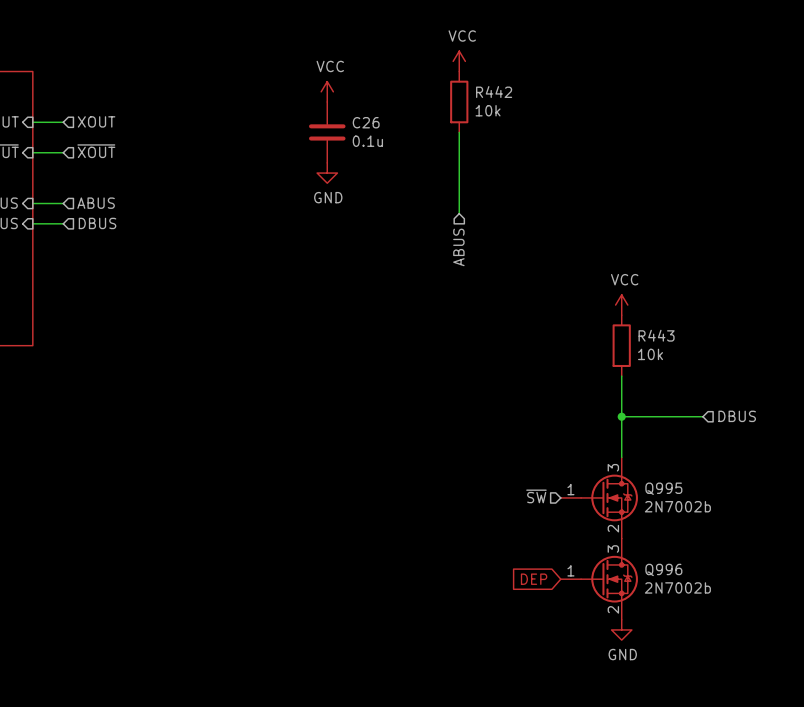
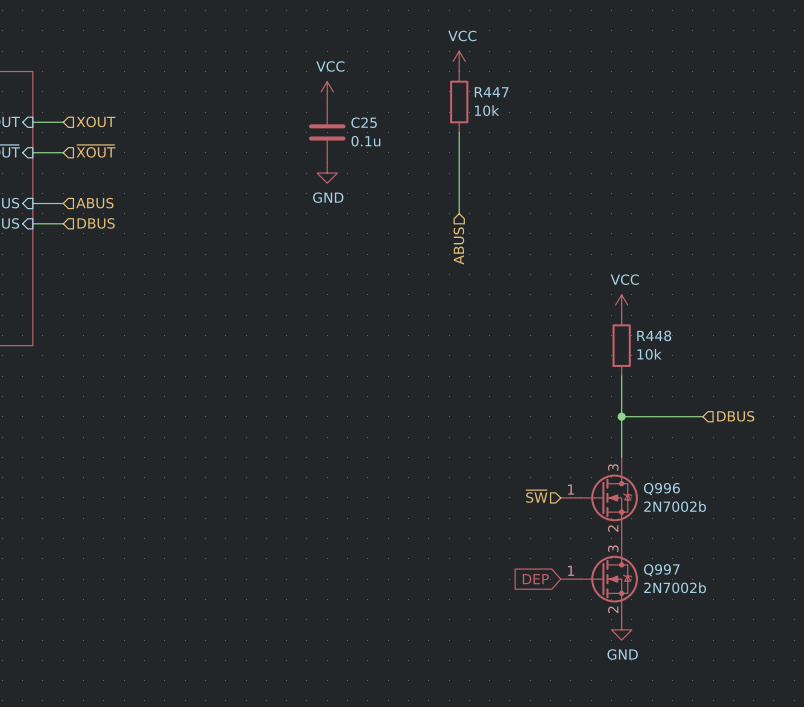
R442 name: R442 (494, 92) -> R447 (491, 92)
C26 name: C26 (366, 122) -> C25 (364, 122)
R443 name: R443 (656, 335) -> R448 (654, 335)
Q995 name: Q995 (663, 488) -> Q996 (661, 489)
Q996 name: Q996 (663, 569) -> Q997 (661, 570)

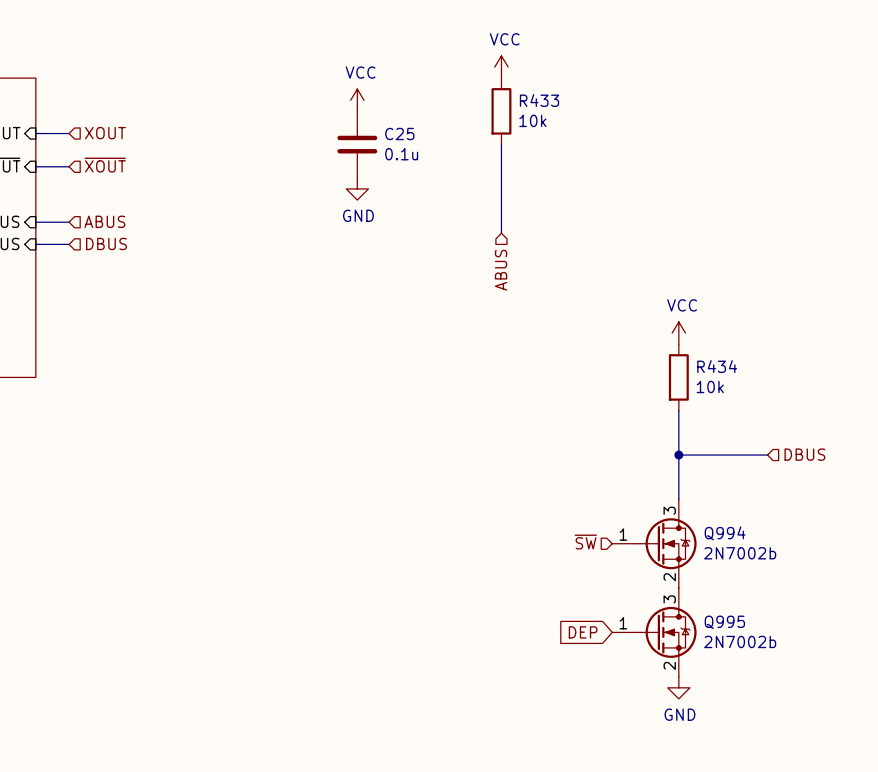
R447 name: R447 (491, 92) -> R433 (539, 100)
R448 name: R448 (654, 335) -> R434 (717, 366)
Q996 name: Q996 (661, 489) -> Q994 (725, 533)
Q997 name: Q997 (661, 570) -> Q995 (724, 622)

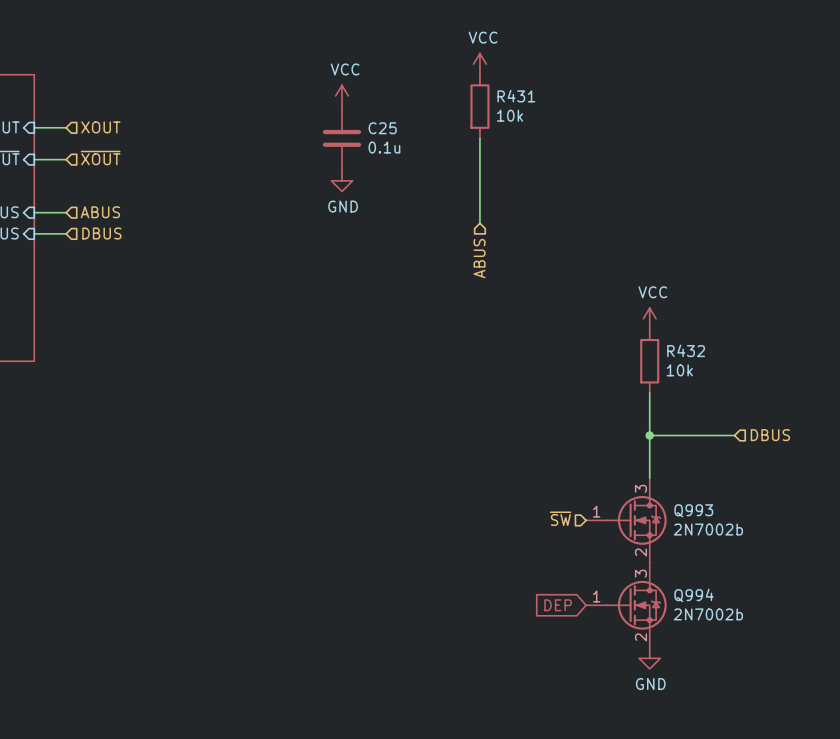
R433 name: R433 (539, 100) -> R431 (516, 96)
R434 name: R434 (717, 366) -> R432 (686, 350)
Q994 name: Q994 (725, 533) -> Q993 (693, 510)
Q995 name: Q995 (724, 622) -> Q994 (694, 595)

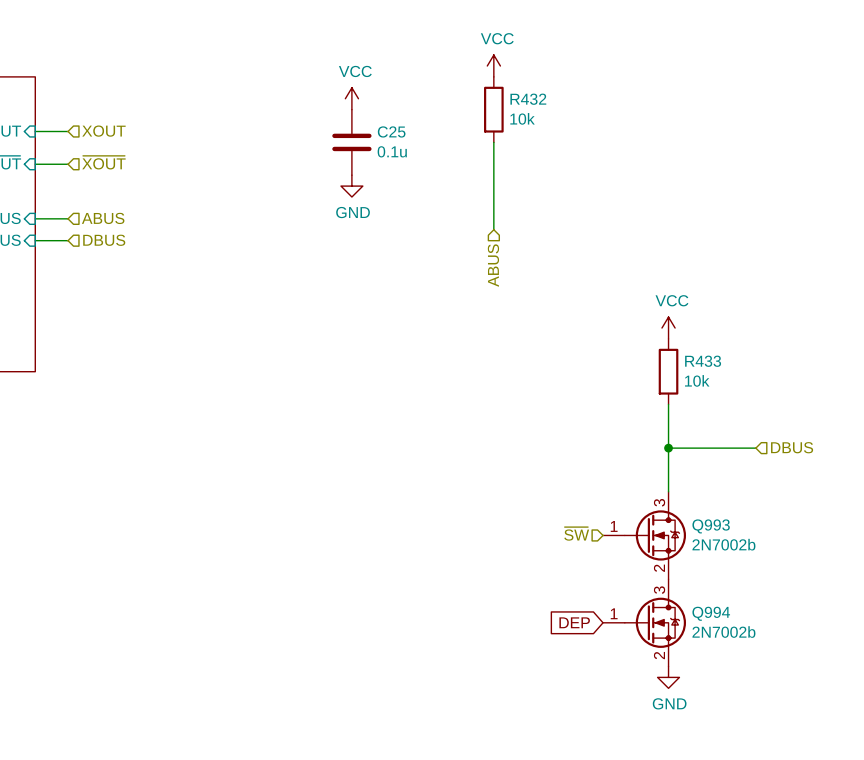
R431 name: R431 (516, 96) -> R432 (528, 99)
R432 name: R432 (686, 350) -> R433 (703, 361)

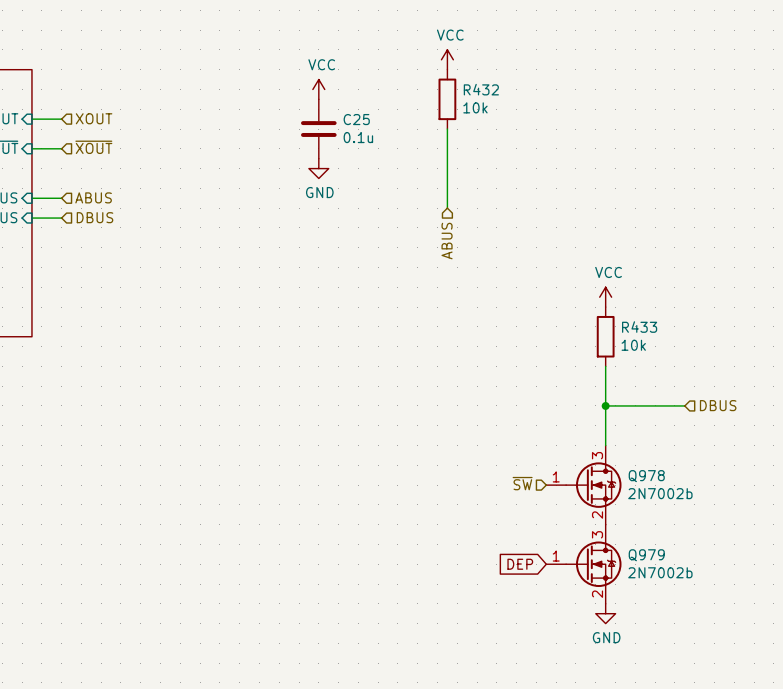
Q993 name: Q993 (711, 526) -> Q978 (646, 476)
Q994 name: Q994 (711, 613) -> Q979 (646, 555)

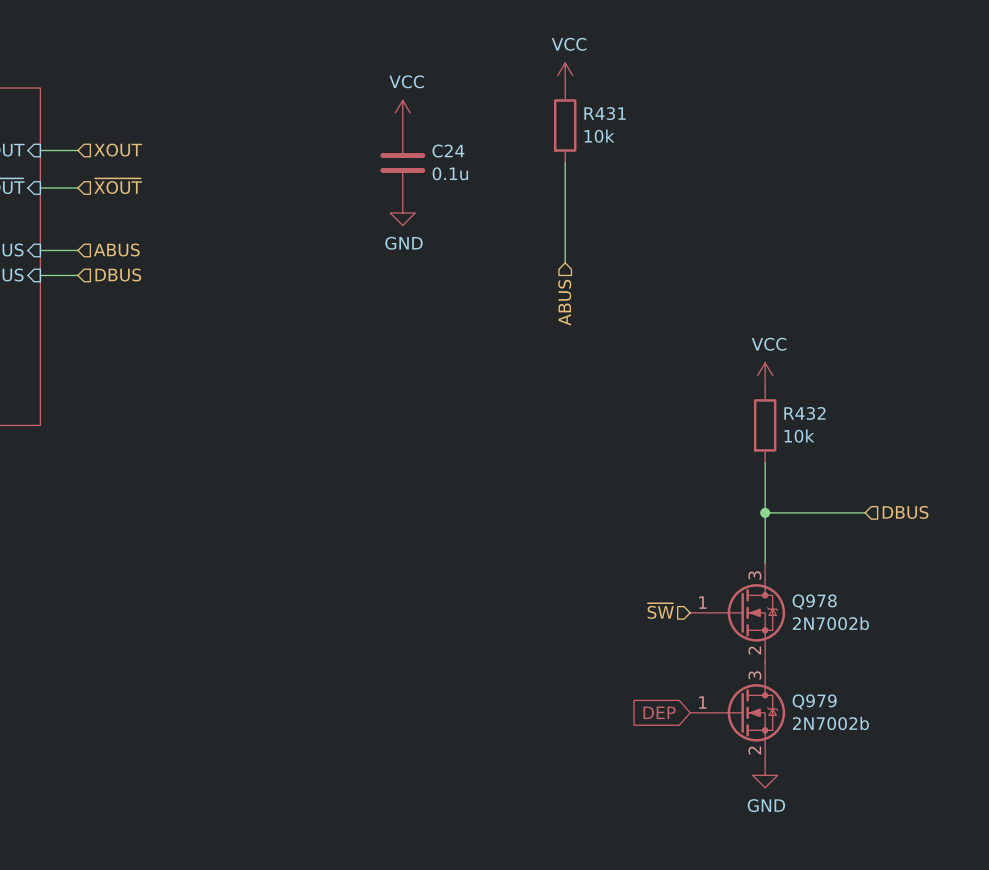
R432 name: R432 (481, 89) -> R431 (605, 113)
C25 name: C25 (356, 119) -> C24 (448, 151)
R433 name: R433 (639, 327) -> R432 (804, 413)

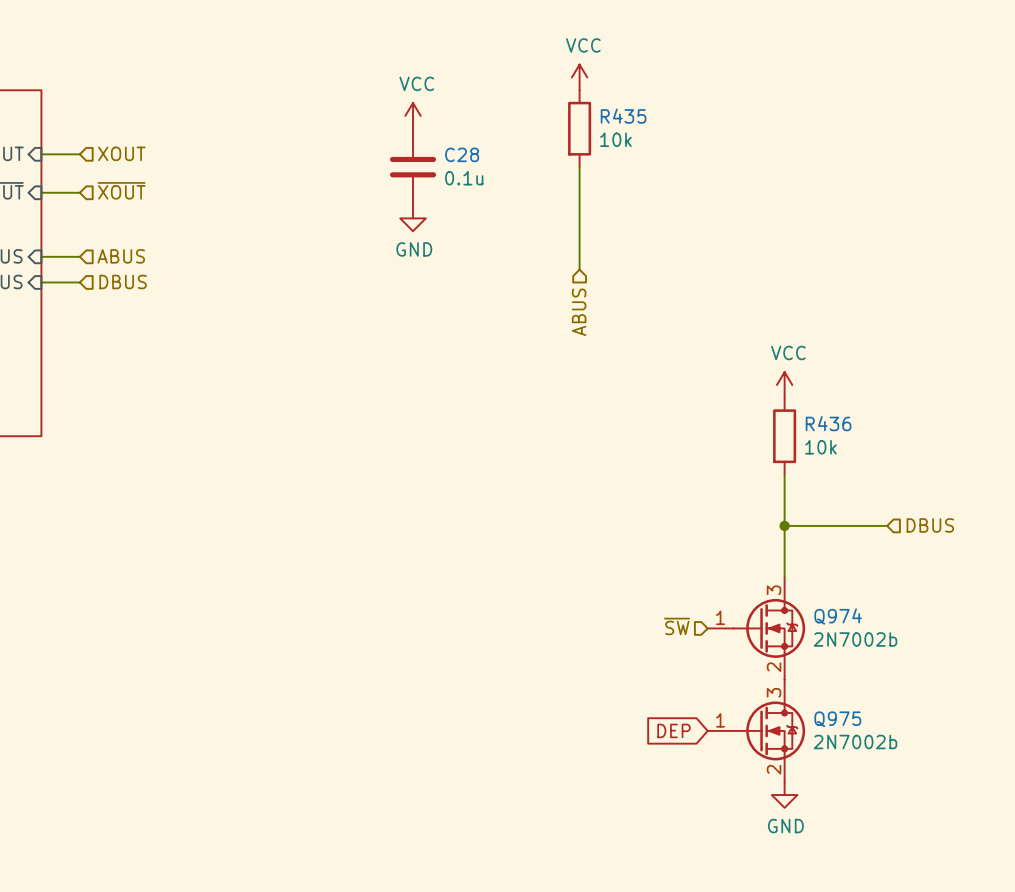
R431 name: R431 (605, 113) -> R435 (623, 116)
C24 name: C24 (448, 151) -> C28 (462, 154)
R432 name: R432 (804, 413) -> R436 (828, 423)
Q978 name: Q978 (814, 601) -> Q974 (838, 616)
Q979 name: Q979 (814, 701) -> Q975 (837, 719)

